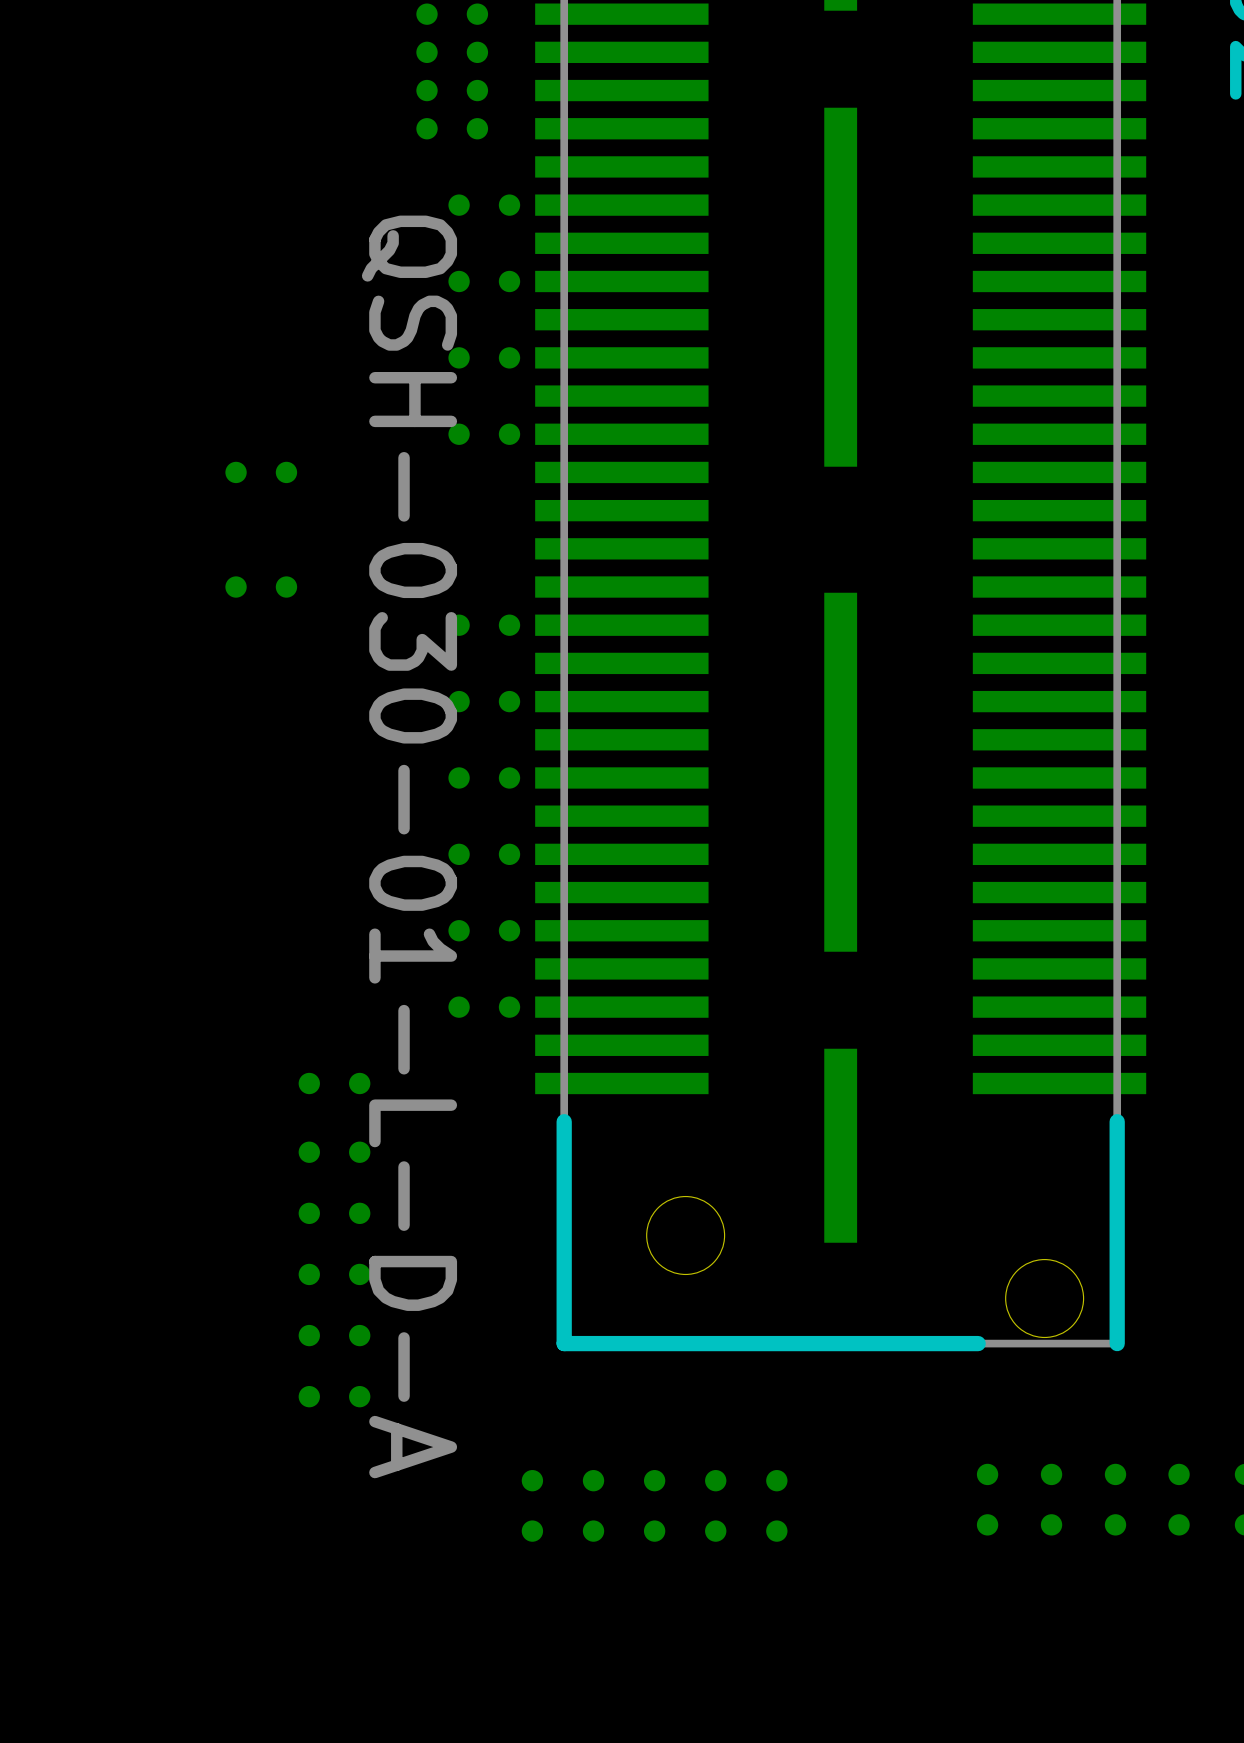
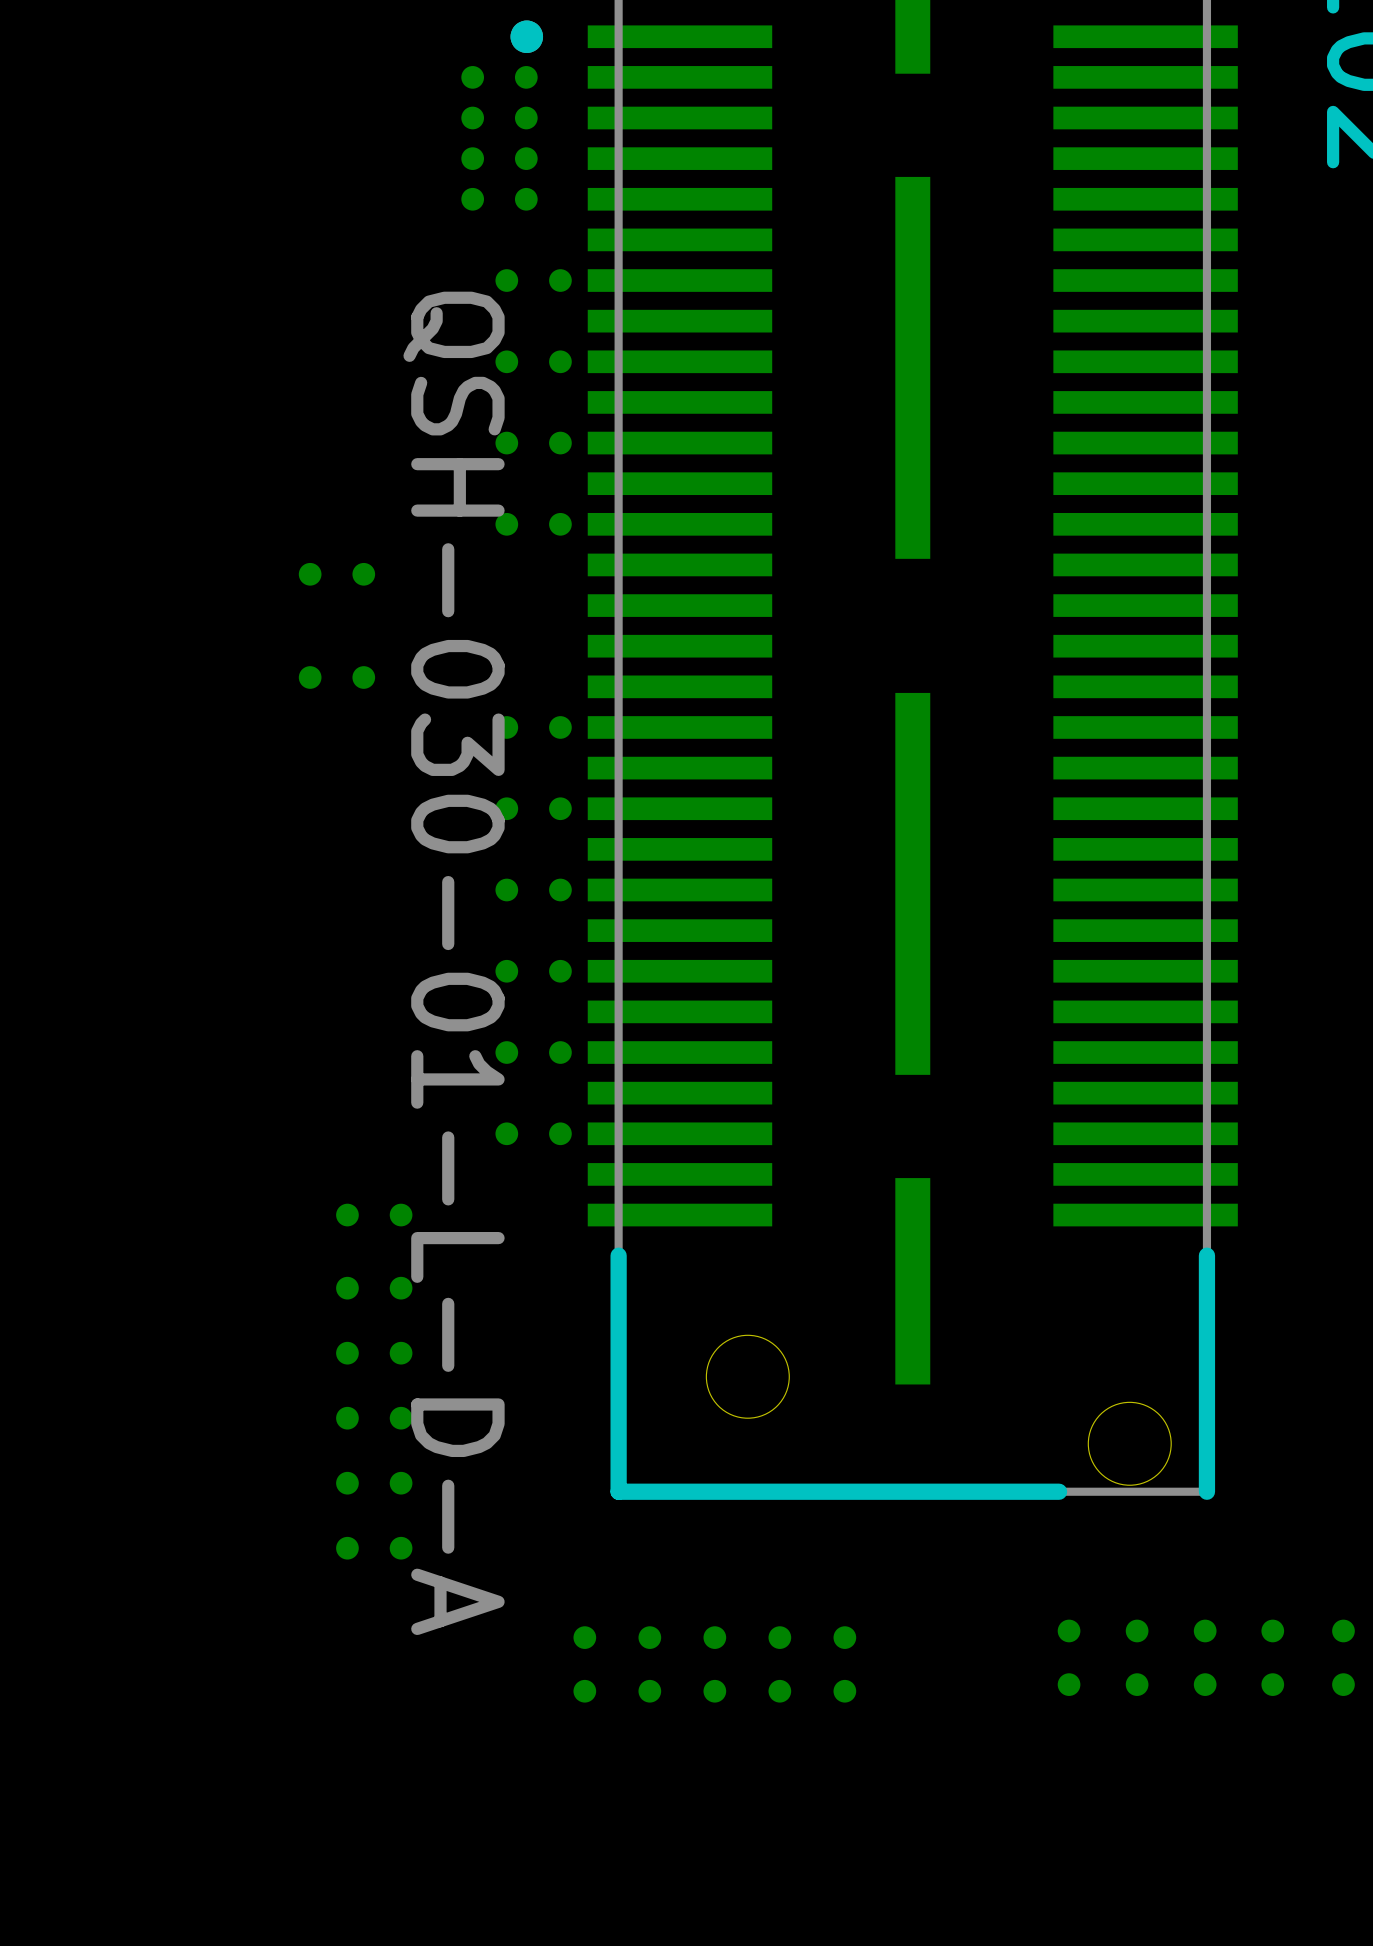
part position: (261, 472) -> (336, 574)
part position: (261, 587) -> (336, 677)

